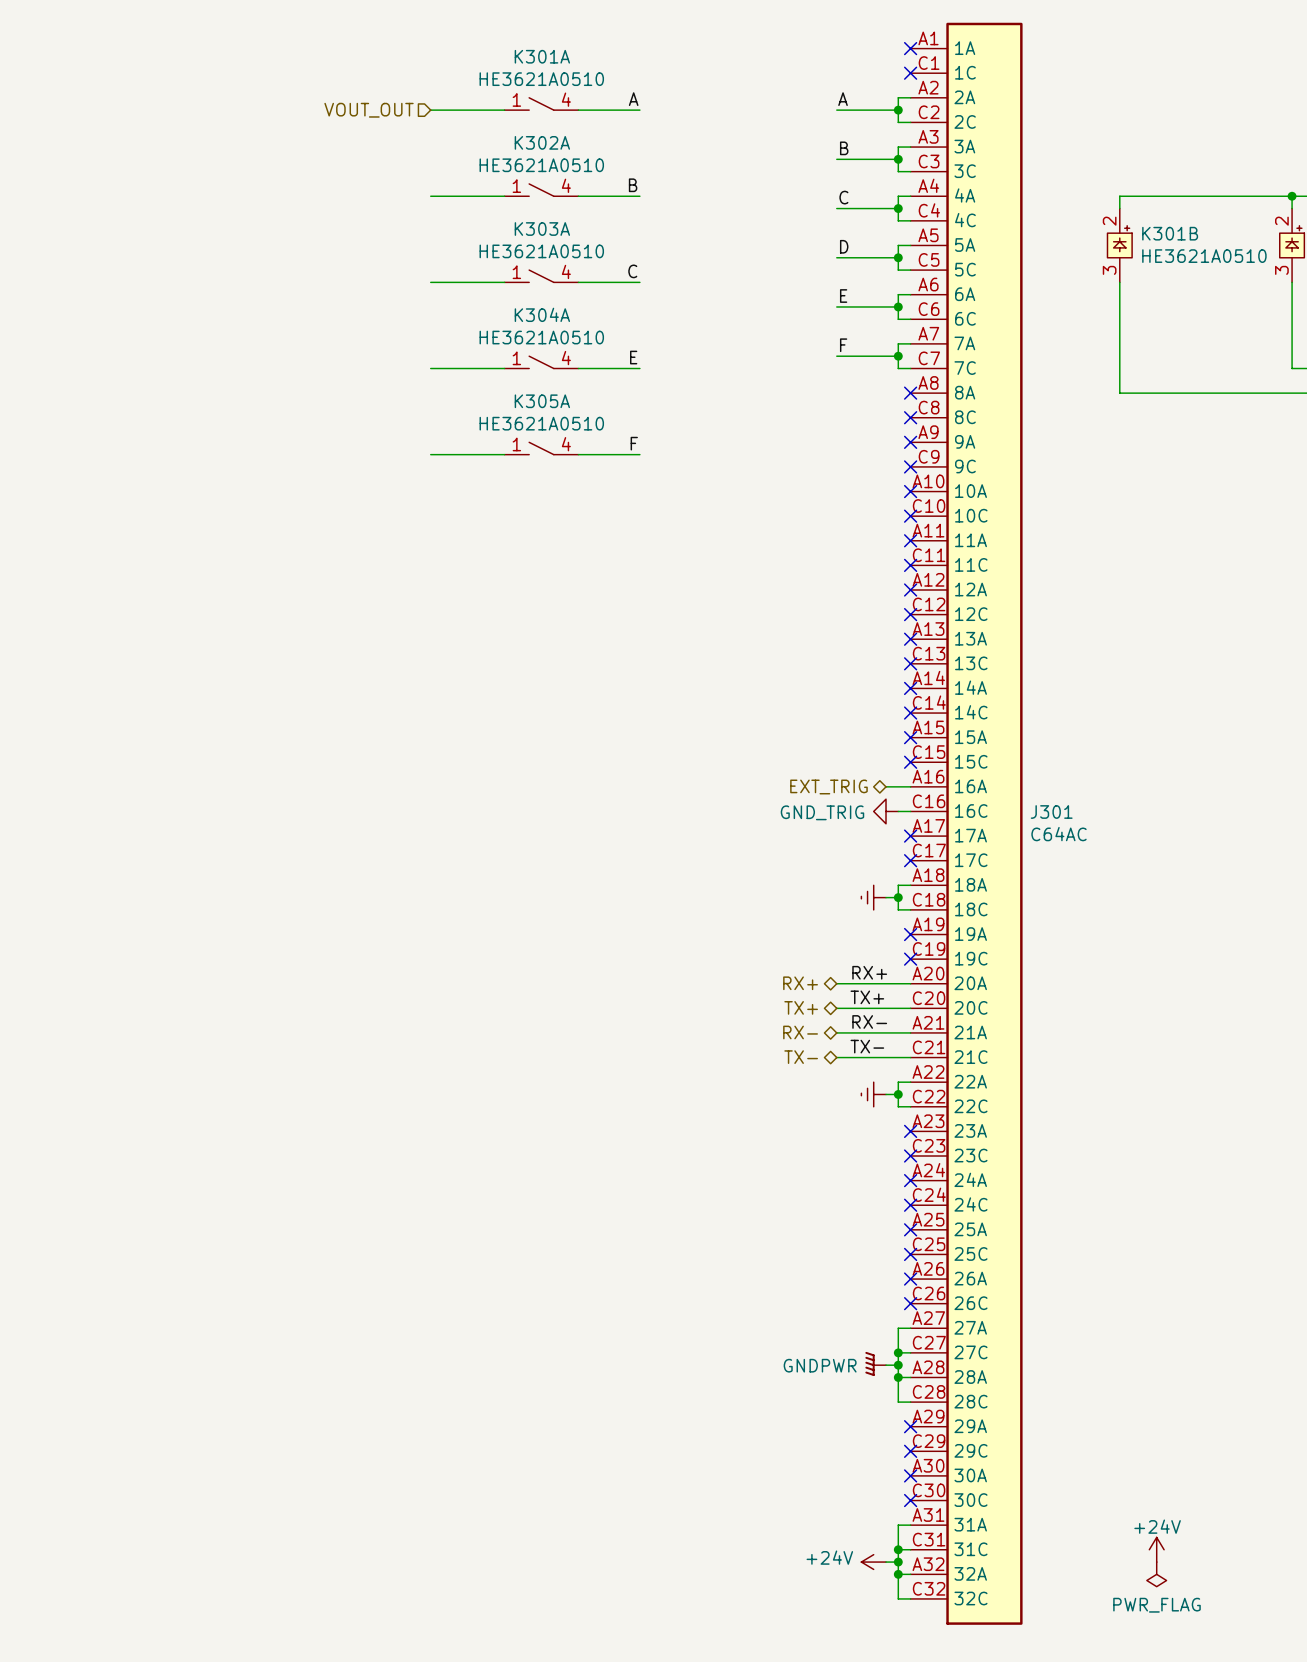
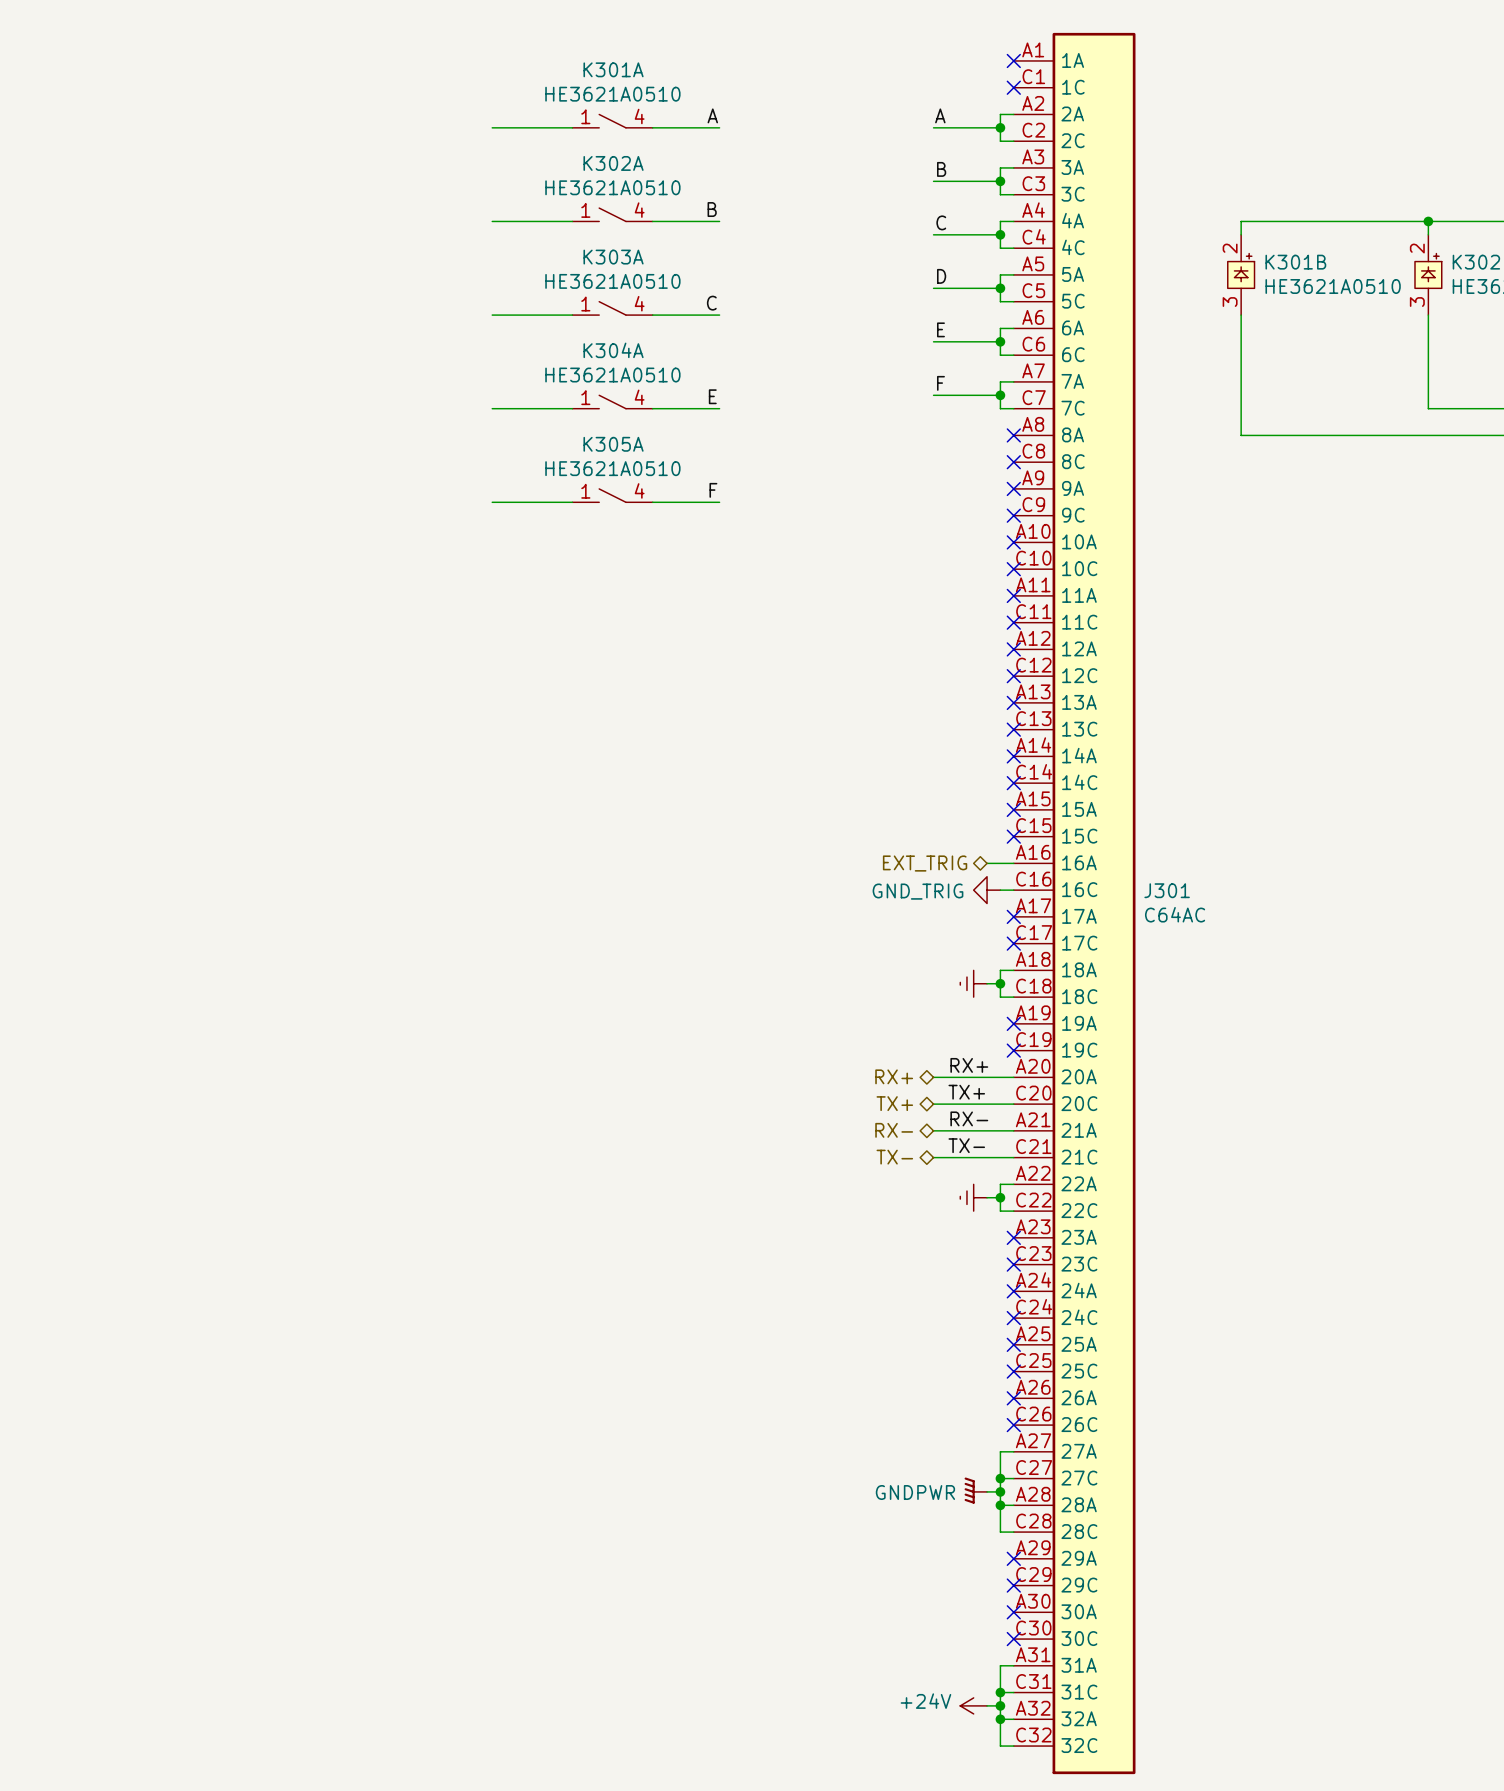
hierarchical label: VOUT_OUT (369, 110) -> none
power symbol: +24V (1156, 1549) -> none
power symbol: PWR_FLAG (1156, 1574) -> none

